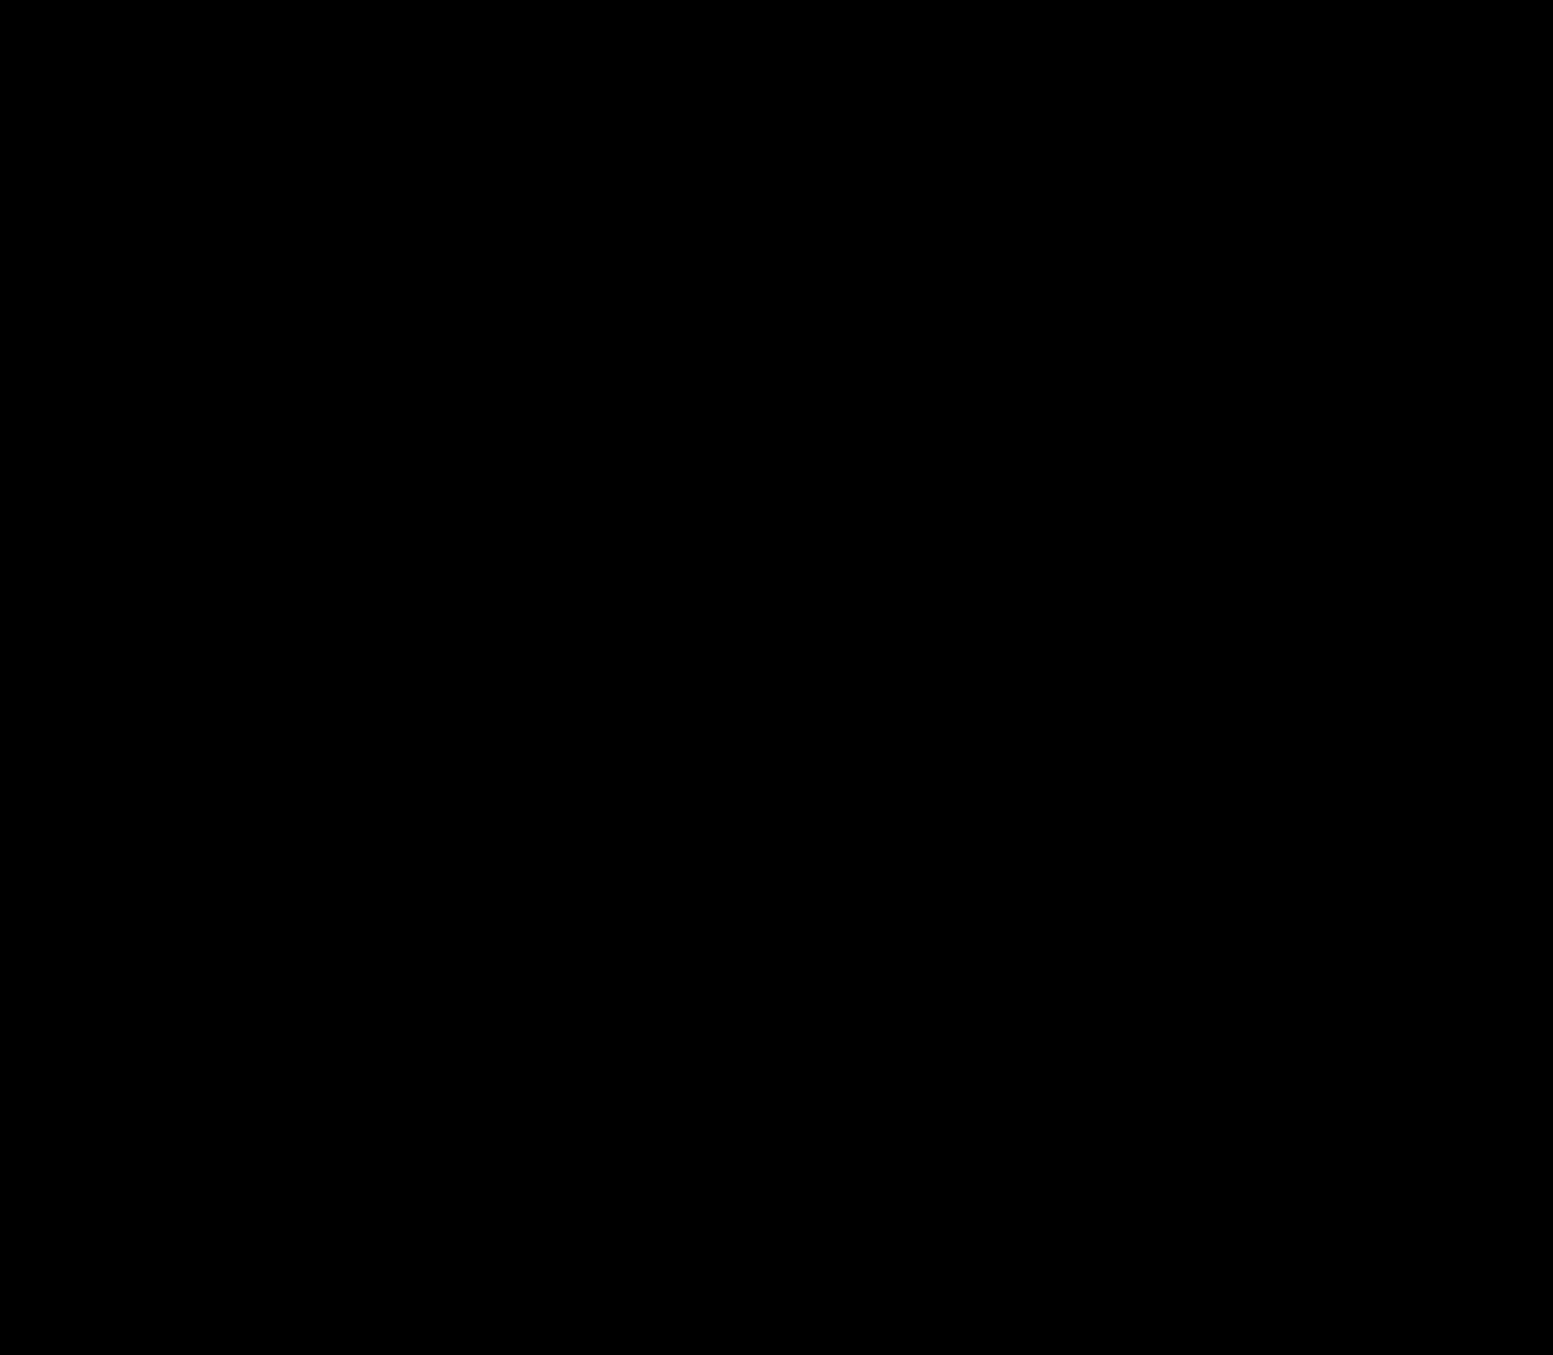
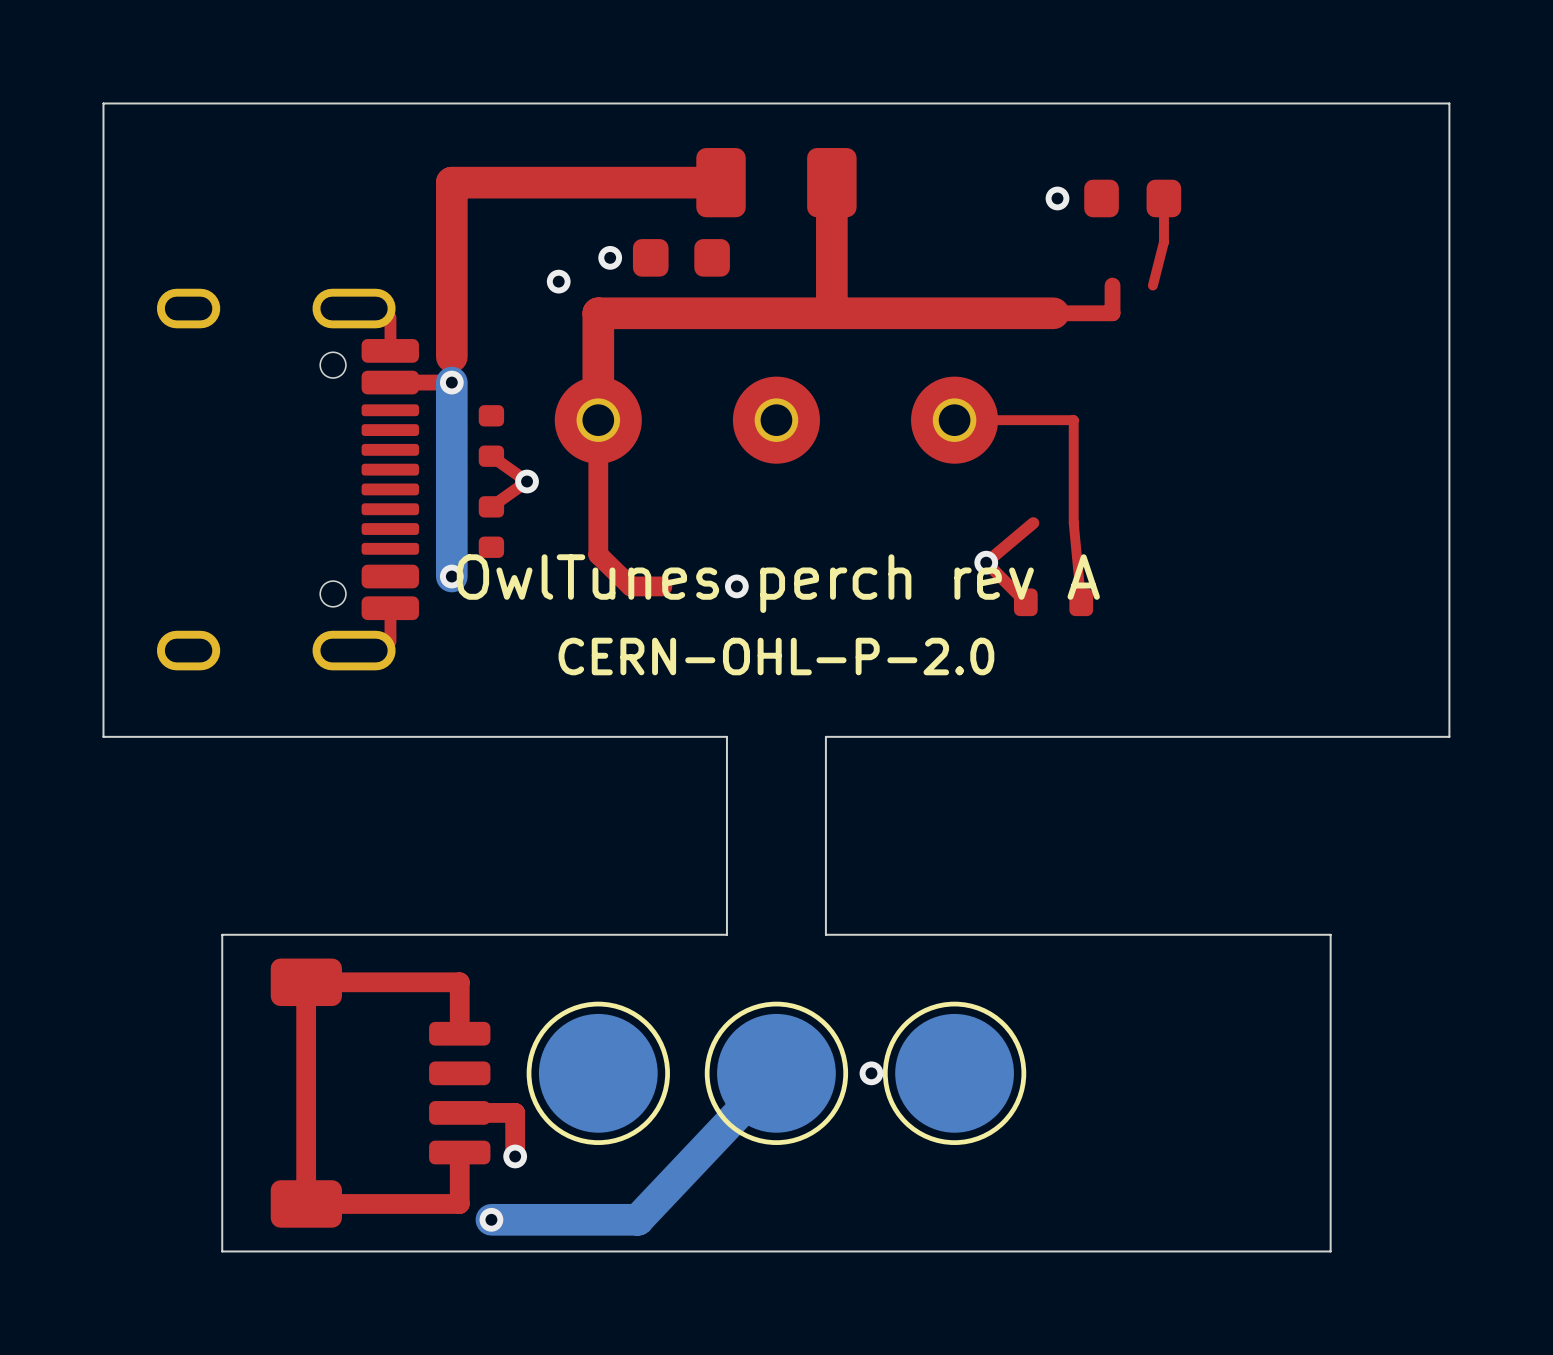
board edge: none -> (1449, 103) (103, 103) (103, 736) (726, 736) (726, 934) (222, 934) (222, 1251) (1330, 1251) (1330, 934) (825, 934) (825, 736) (1449, 736) (1449, 103)
top track: none -> (721, 182) (451, 182) (451, 382) (390, 382)
part: none -> (776, 182)
top track: none -> (831, 182) (831, 313)
via: none -> (1057, 198)
part: none -> (1132, 198)
top track: none -> (1163, 198) (1163, 242) (1152, 285)
via: none -> (610, 257)
part: none -> (681, 257)
via: none -> (558, 281)
top track: none -> (1112, 285) (1112, 313) (598, 313) (598, 554) (630, 586) (662, 586)
top track: none -> (390, 317) (390, 350)
bottom track: none -> (451, 382) (451, 576)
via: none -> (451, 382)
part: none -> (598, 420)
part: none -> (776, 420)
top track: none -> (954, 420) (1073, 420) (1073, 523) (1081, 602)
part: none -> (954, 420)
part: none -> (491, 436)
top track: none -> (491, 456) (527, 481) (491, 506)
part: none -> (287, 479)
via: none -> (527, 481)
top track: none -> (1033, 523) (986, 562) (1025, 602)
part: none -> (491, 527)
via: none -> (986, 562)
via: none -> (451, 576)
text: none -> OwlTunes perch rev A (778, 583)
via: none -> (736, 586)
part: none -> (1053, 602)
top track: none -> (390, 608) (390, 641)
text: none -> CERN-OHL-P-2.0 (776, 656)
top track: none -> (459, 1033) (459, 982) (306, 982) (306, 1203) (459, 1203) (459, 1152)
part: none -> (598, 1073)
bottom track: none -> (776, 1073) (637, 1219) (491, 1219)
part: none -> (776, 1073)
via: none -> (871, 1073)
part: none -> (954, 1073)
part: none -> (380, 1093)
top track: none -> (459, 1112) (515, 1112) (515, 1156)
via: none -> (515, 1156)
via: none -> (491, 1219)

